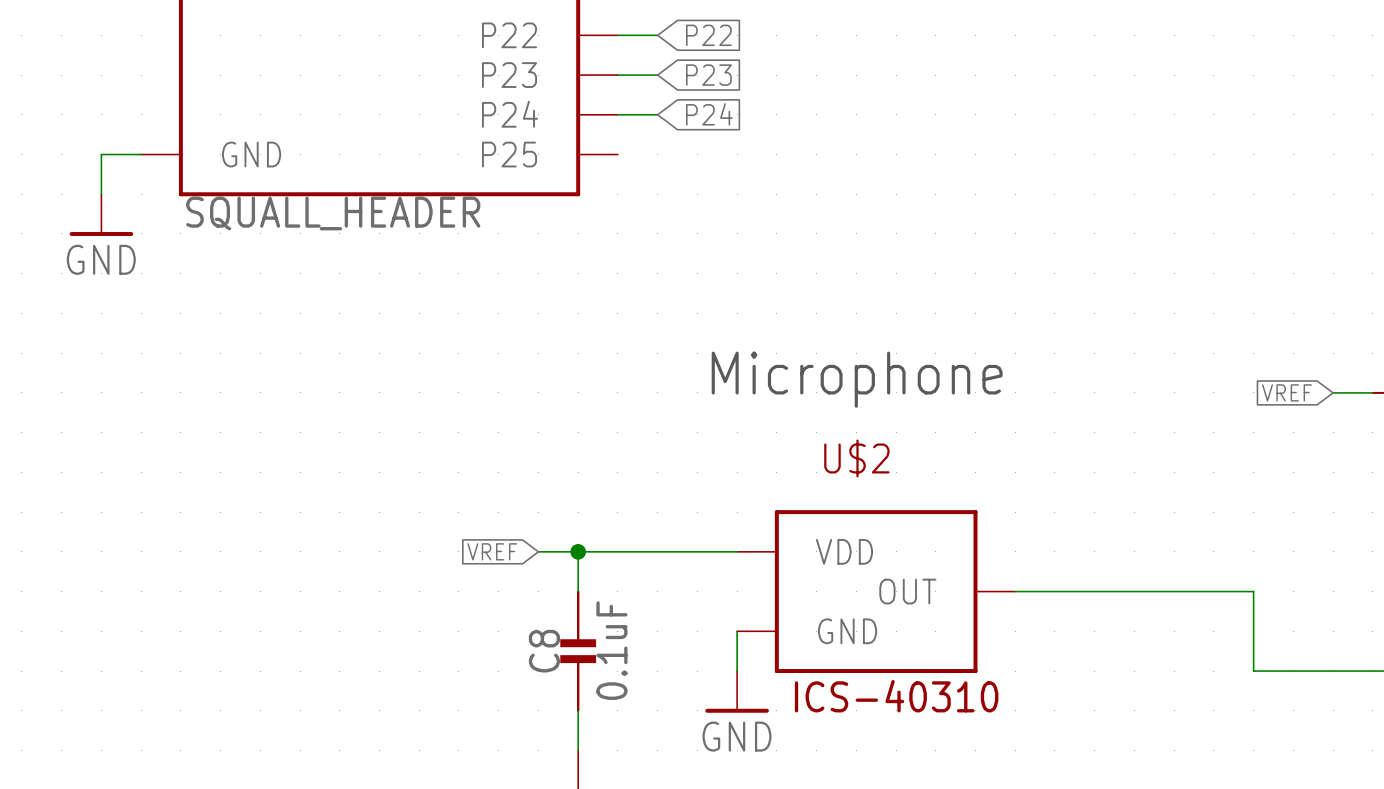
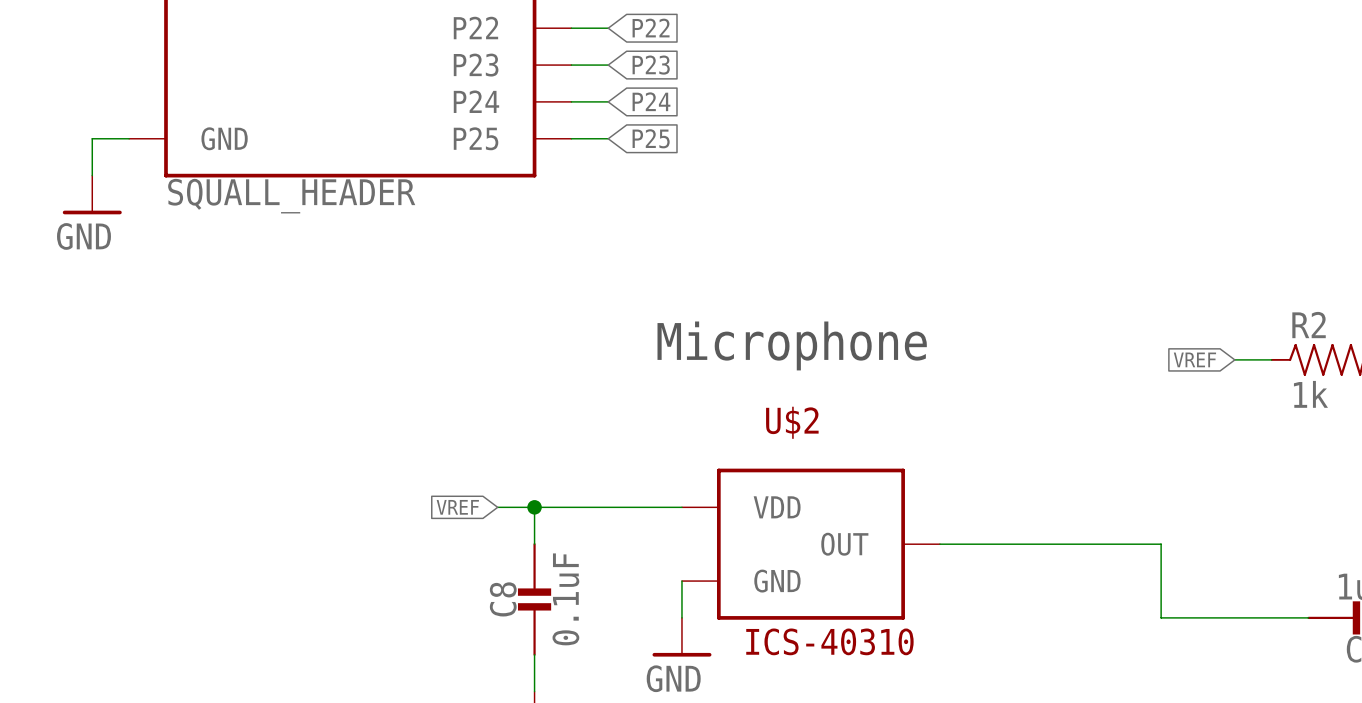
wire: none -> (571, 138) (608, 138)
global label: none -> P25 (651, 138)

